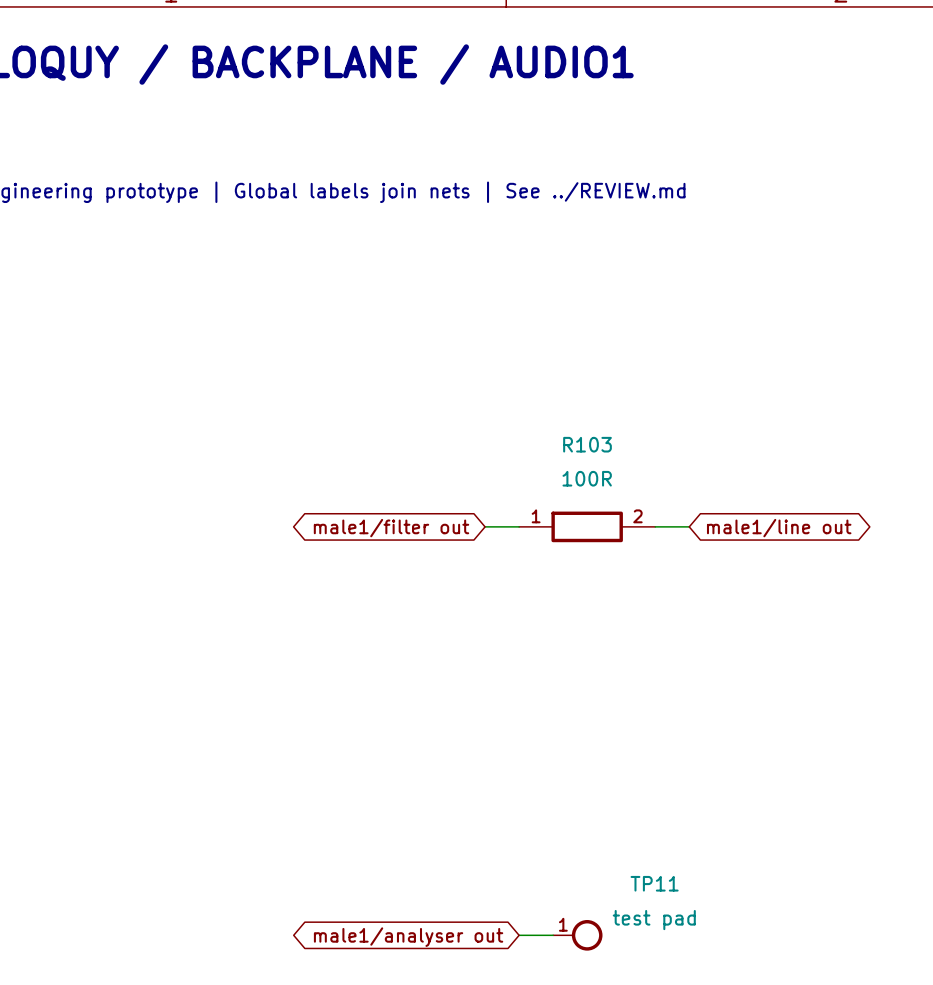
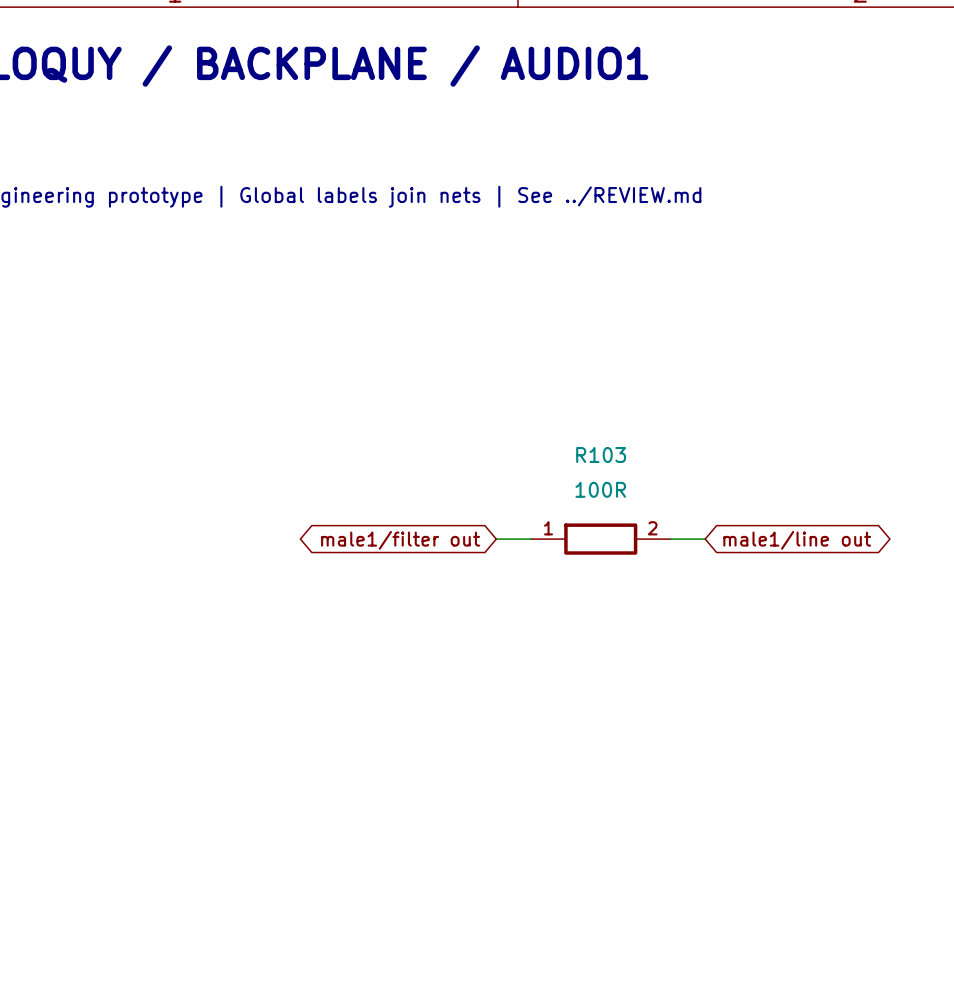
wire: (519, 935) (553, 935) -> none
TP11: test pad (577, 935) -> none
global label: male1/analyser out (408, 937) -> none

